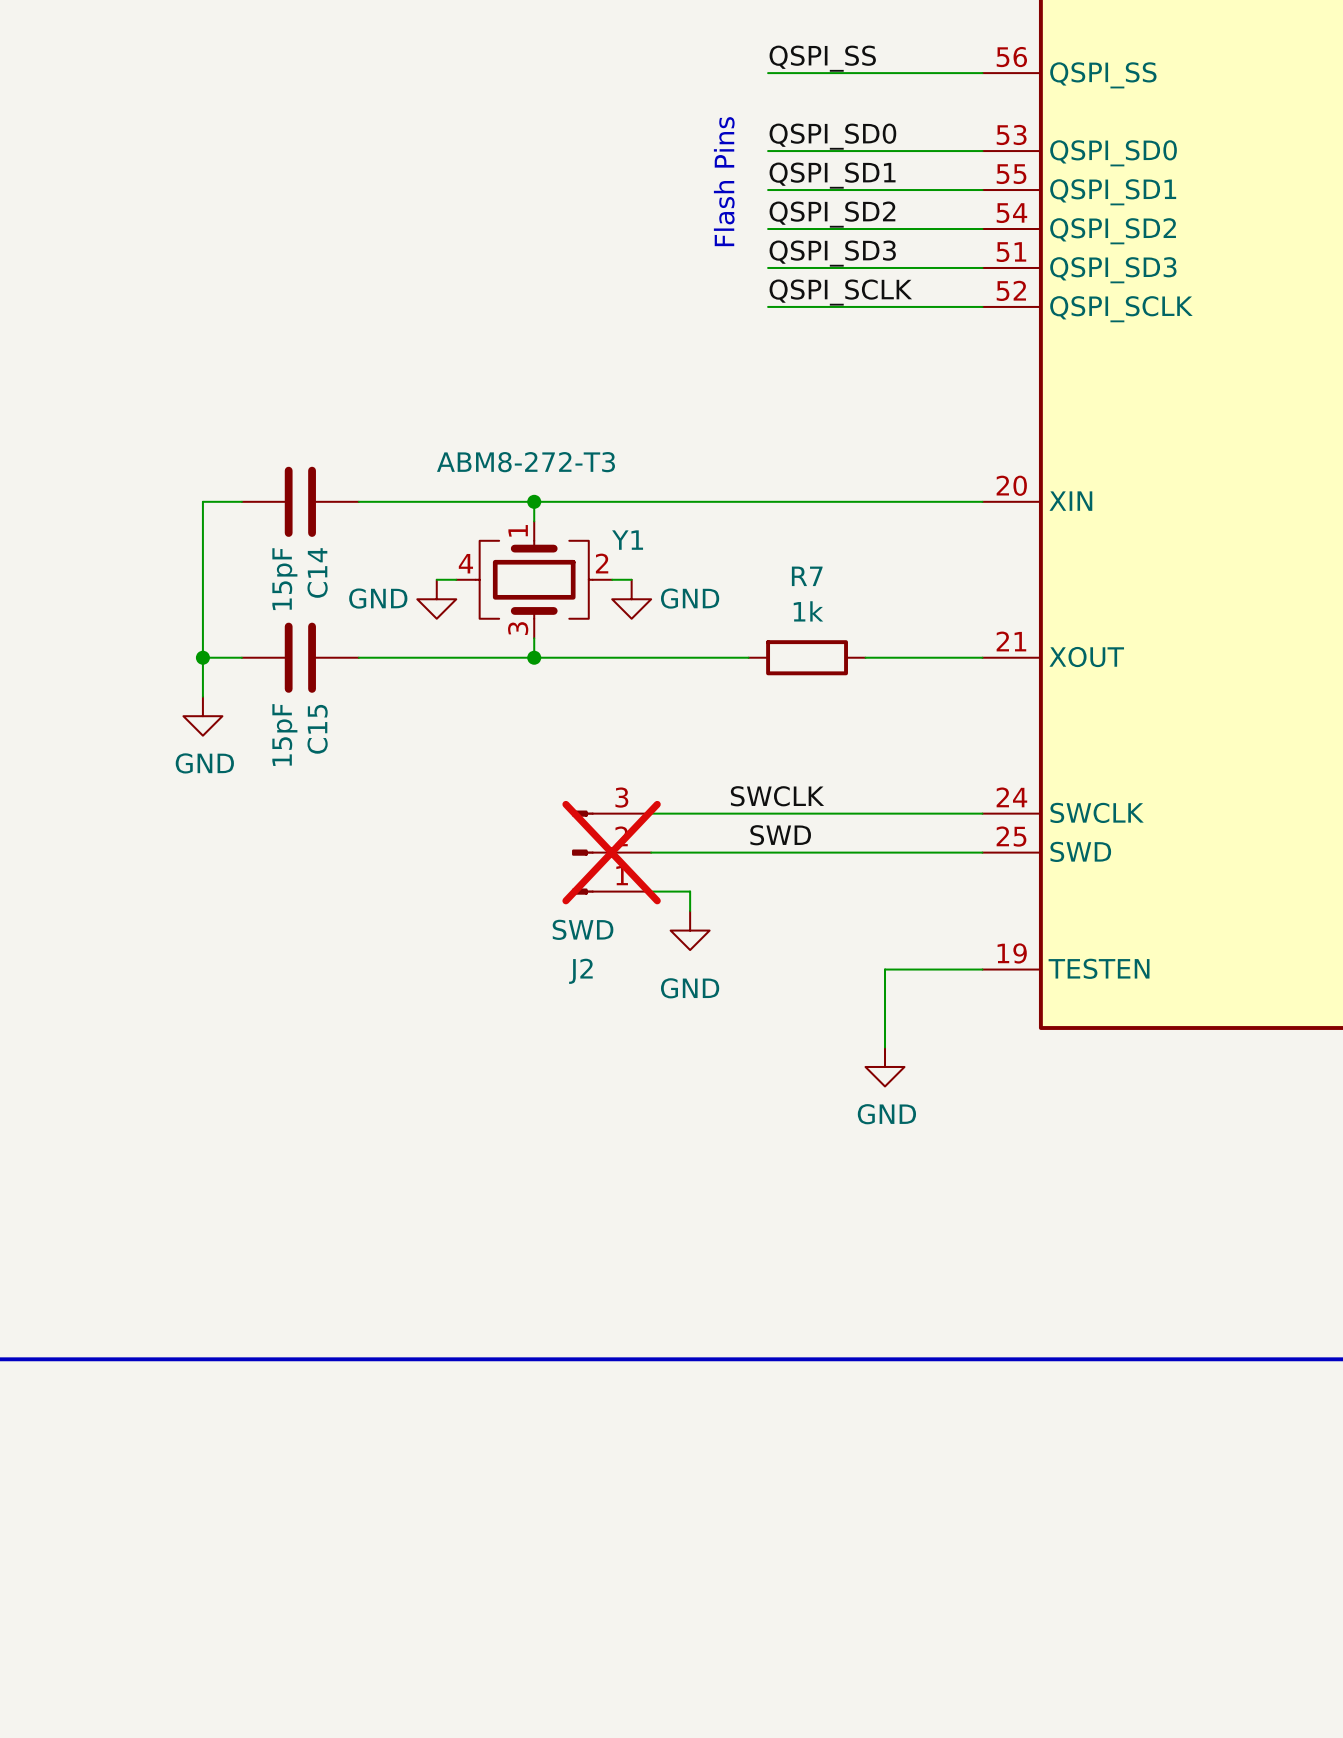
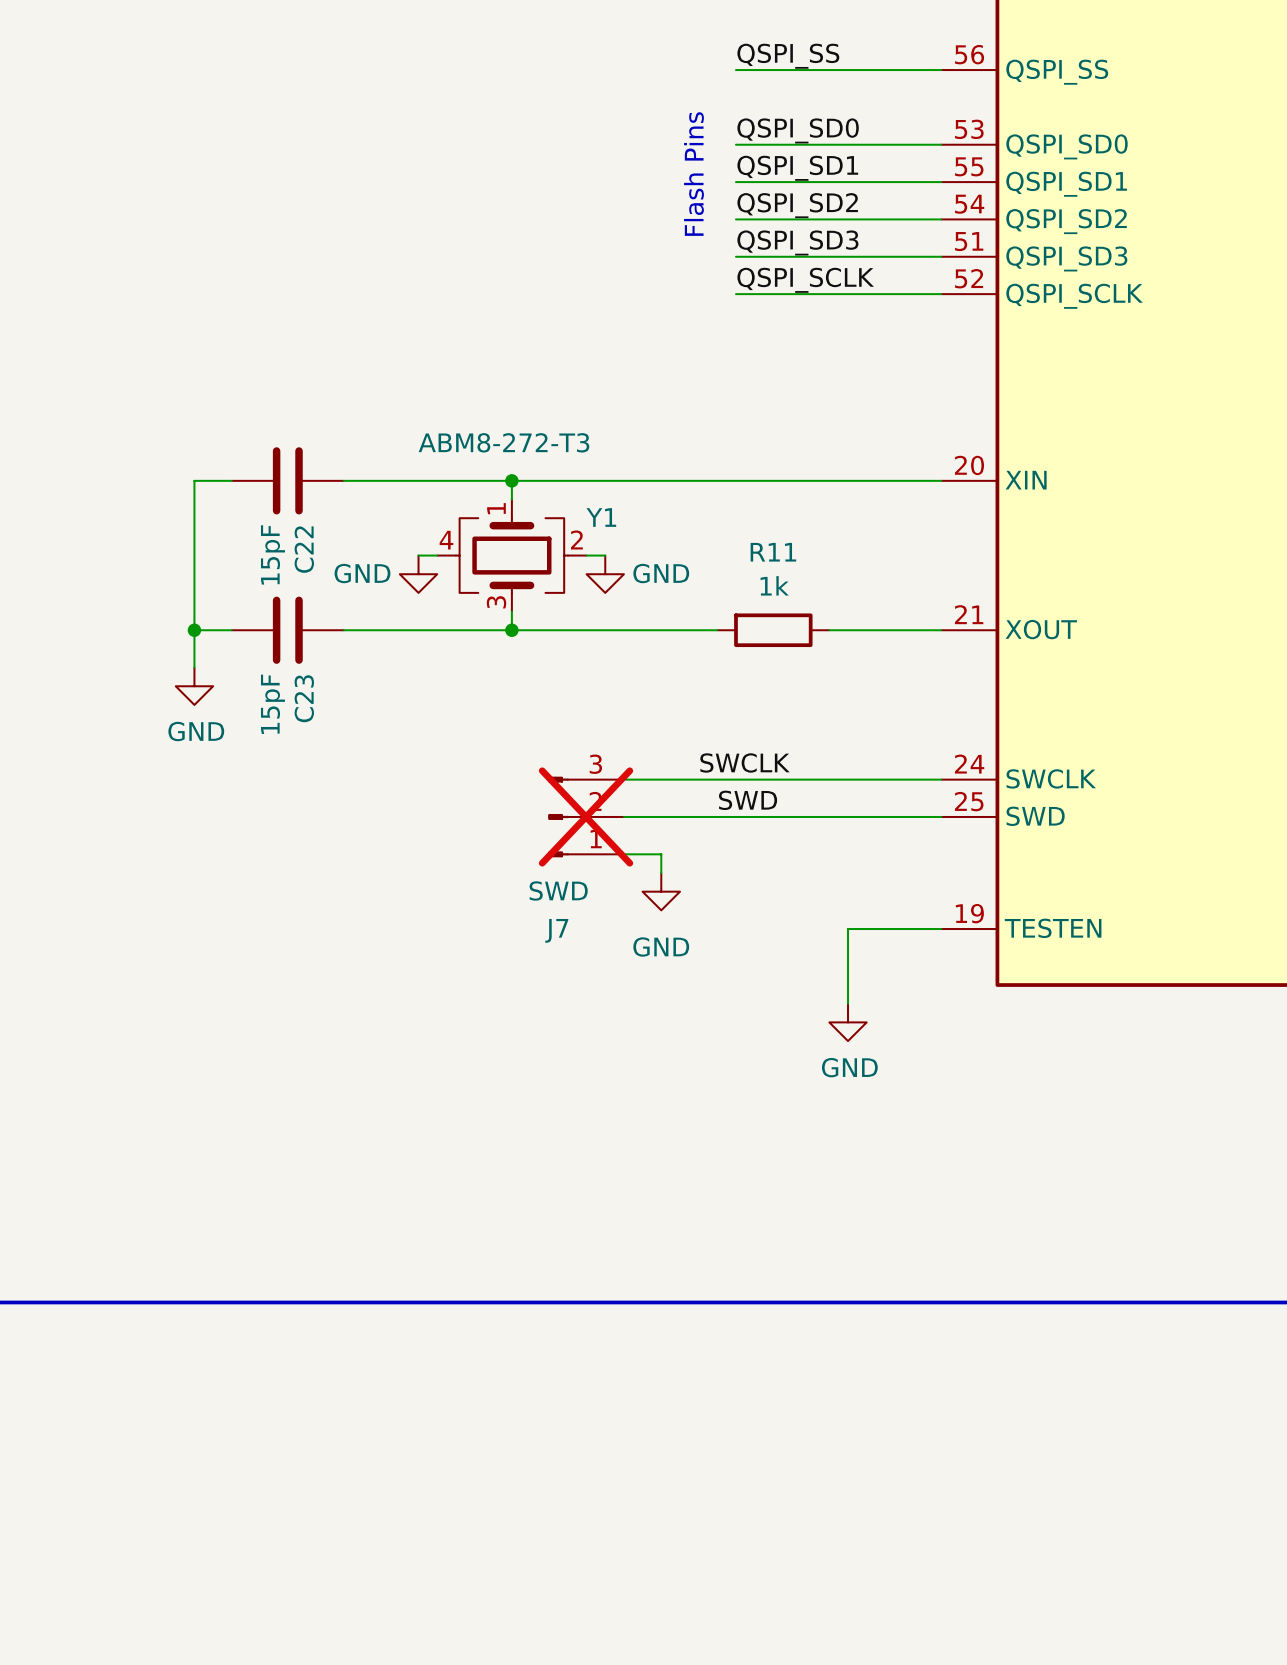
C14 name: C14 (317, 572) -> C22 (304, 549)
R7 name: R7 (807, 576) -> R11 (773, 552)
C15 name: C15 (317, 729) -> C23 (304, 698)
J2 name: J2 (580, 971) -> J7 (556, 930)

